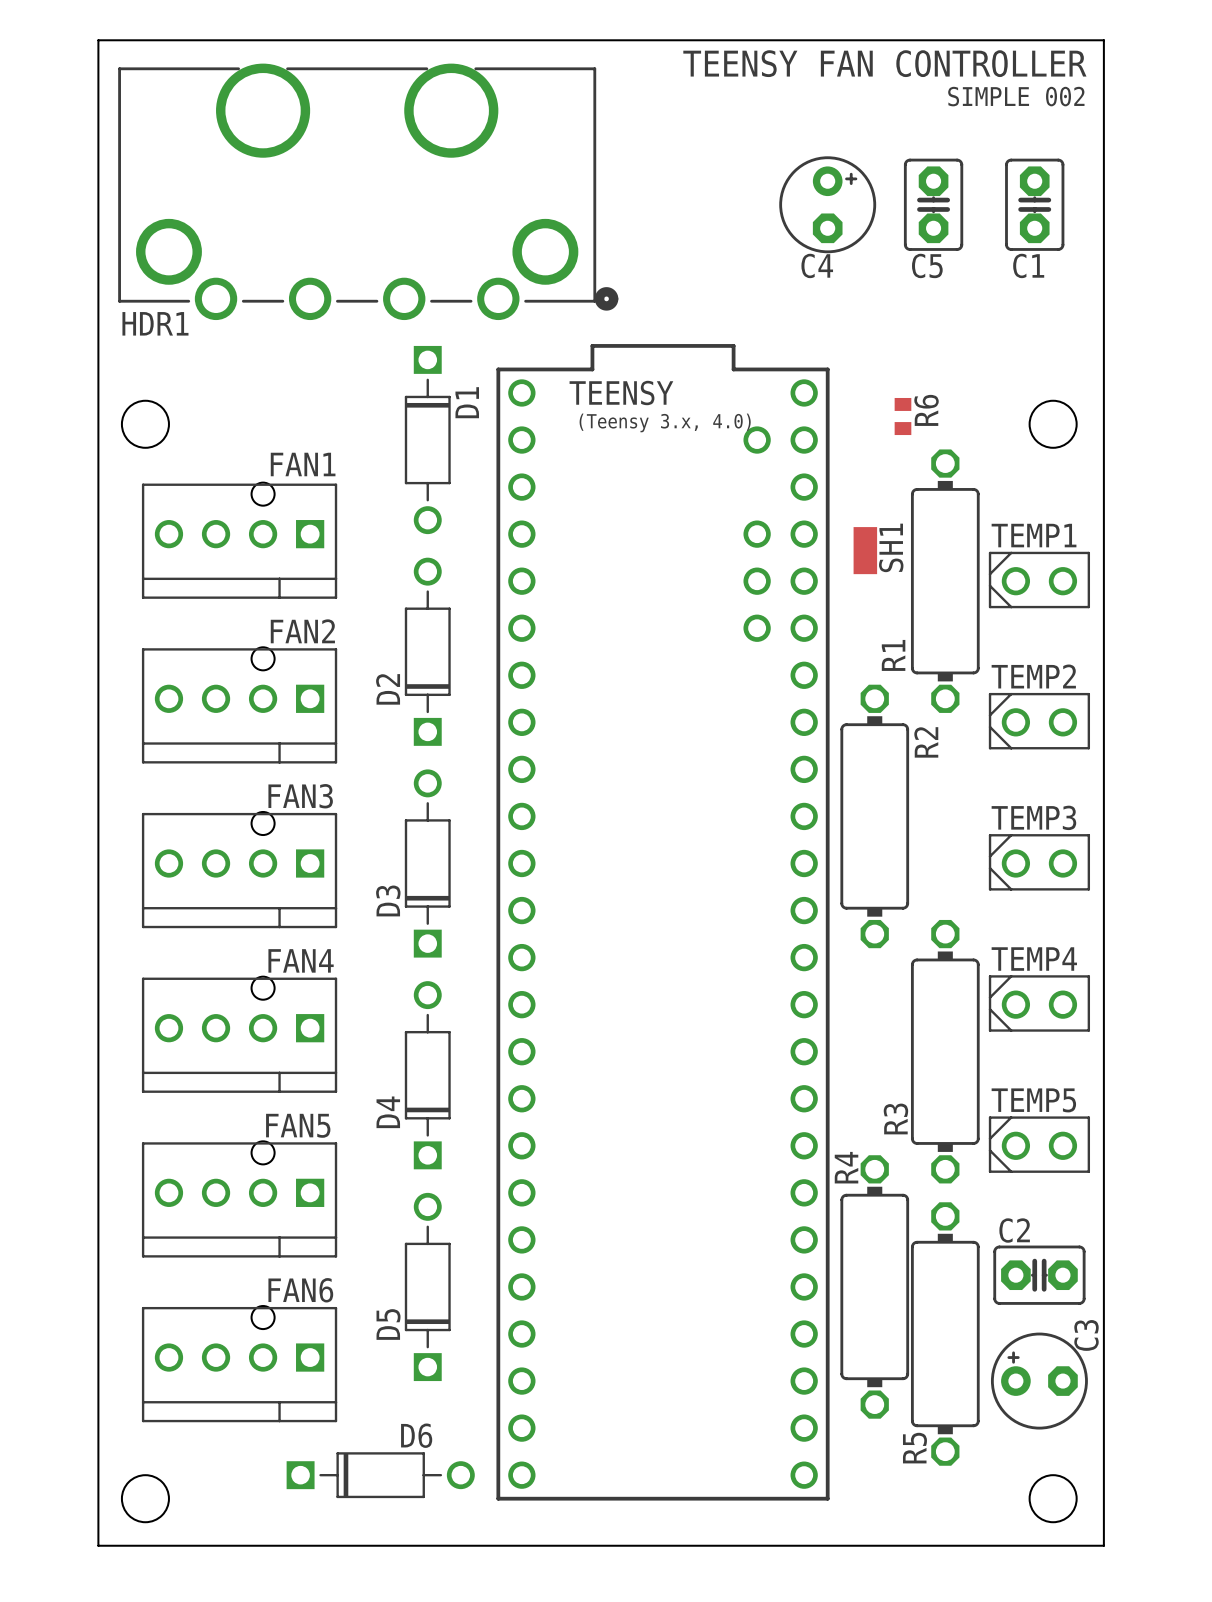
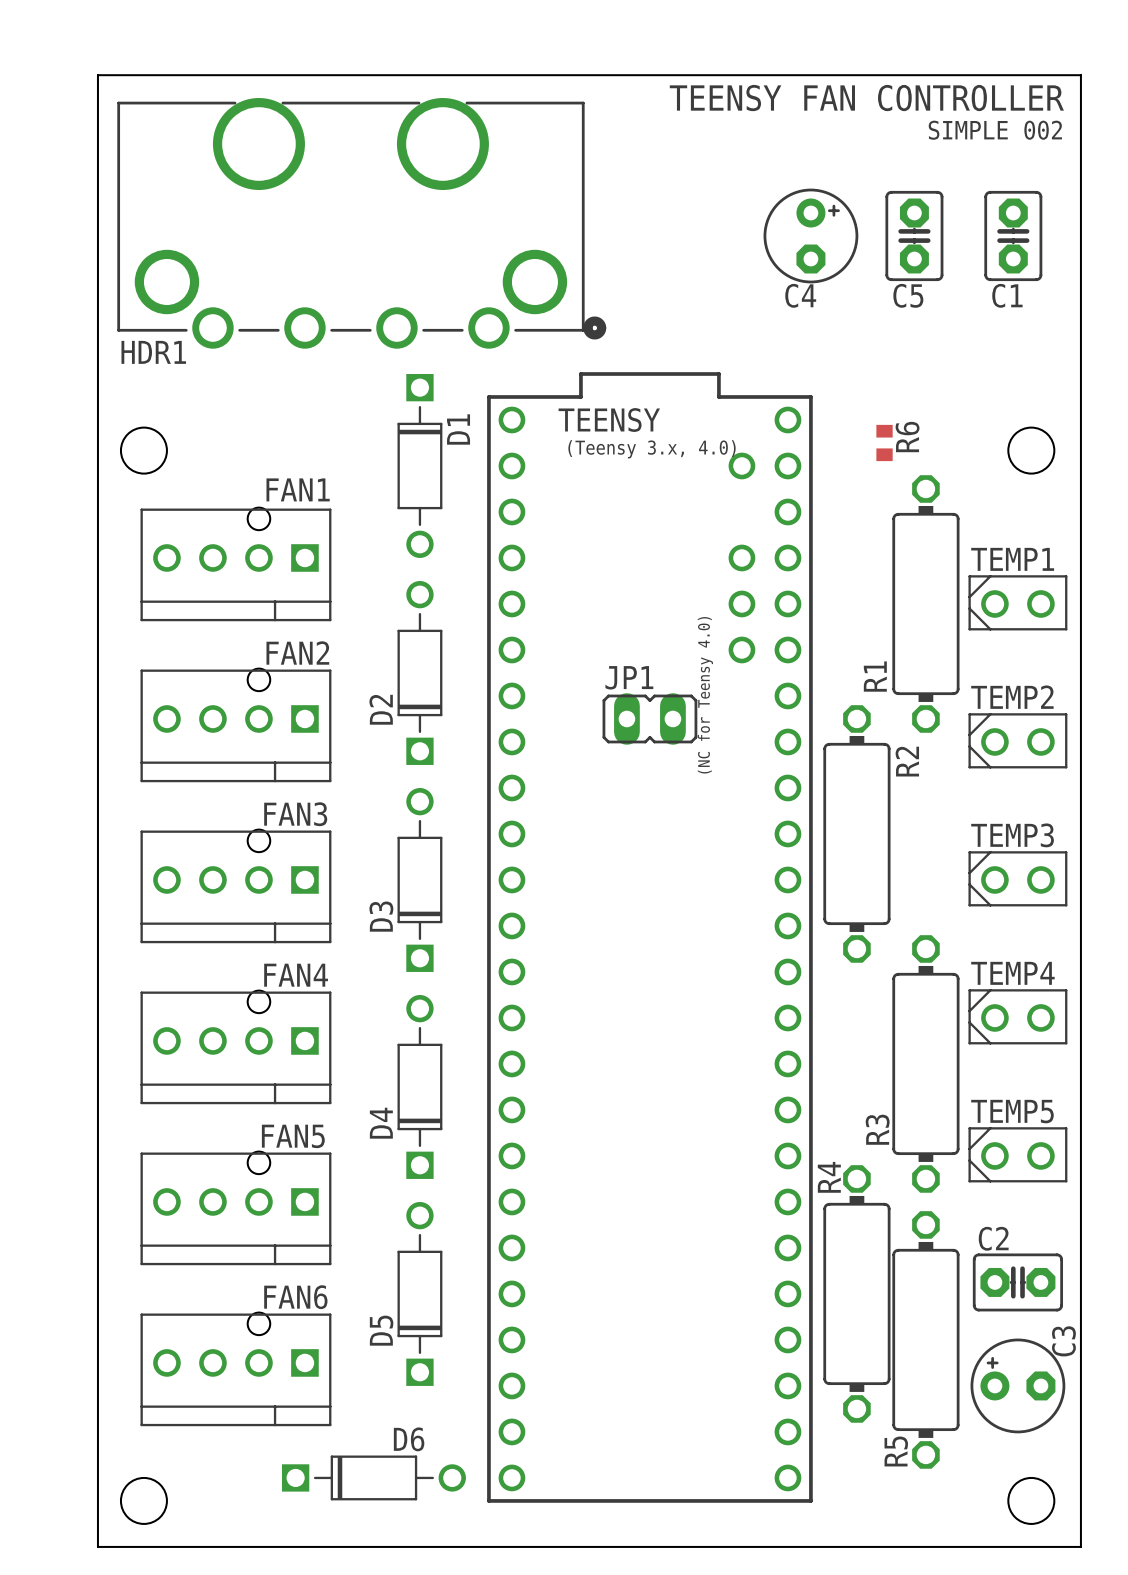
SH1: (865, 550) -> none
text: none -> (NC for Teensy 4.0) (705, 695)
JP1: none -> (649, 718)

